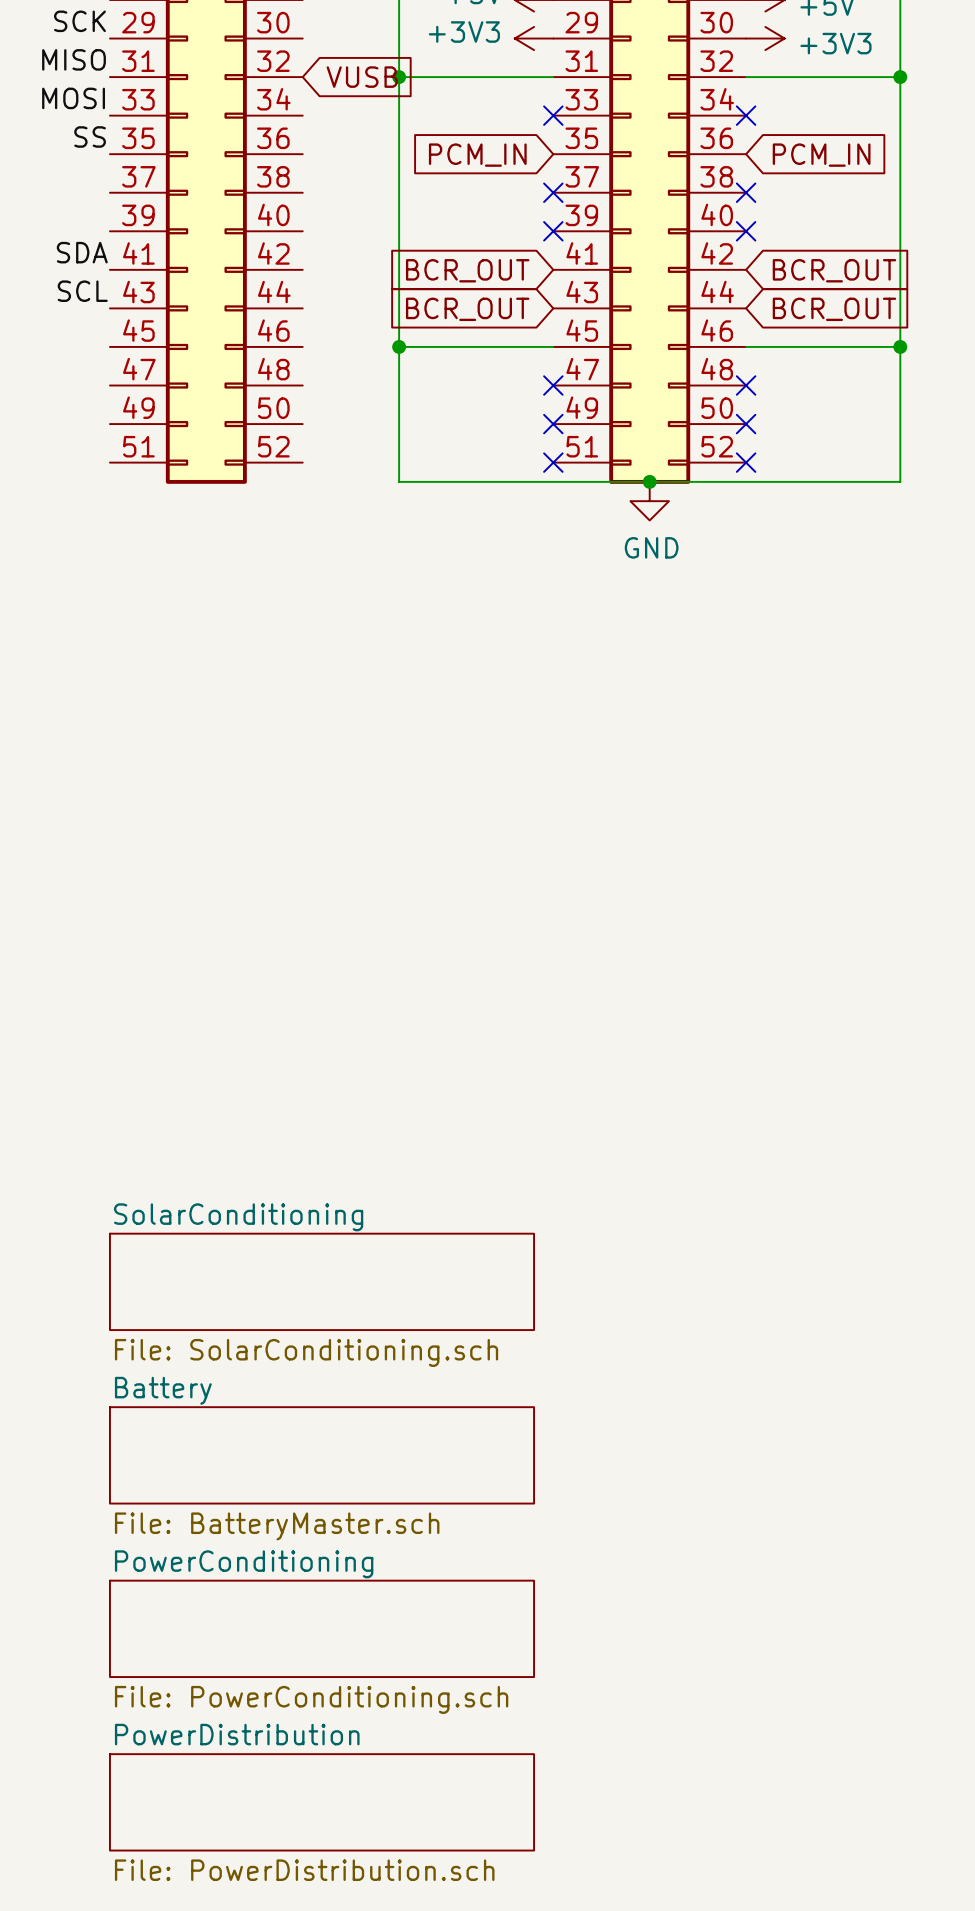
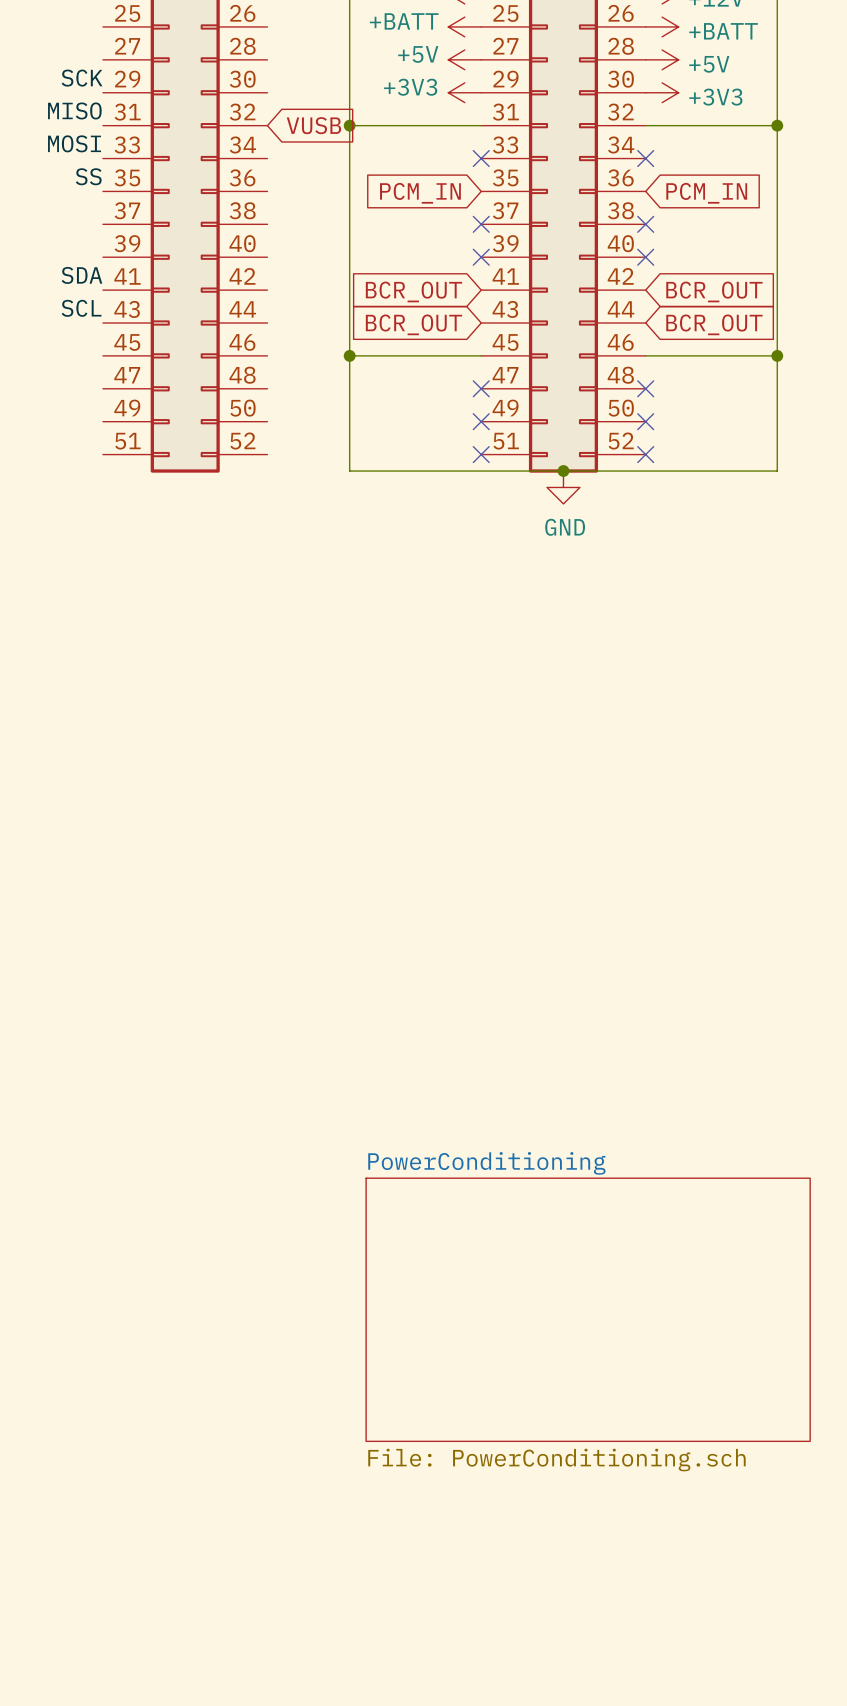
sheet SolarConditioning: File: SolarConditioning.sch (322, 1281) -> none
sheet Battery: File: BatteryMaster.sch (322, 1455) -> none
sheet PowerConditioning: none -> File: PowerConditioning.sch (588, 1309)
sheet PowerConditioning: File: PowerConditioning.sch (322, 1628) -> none
sheet PowerDistribution: File: PowerDistribution.sch (322, 1802) -> none

